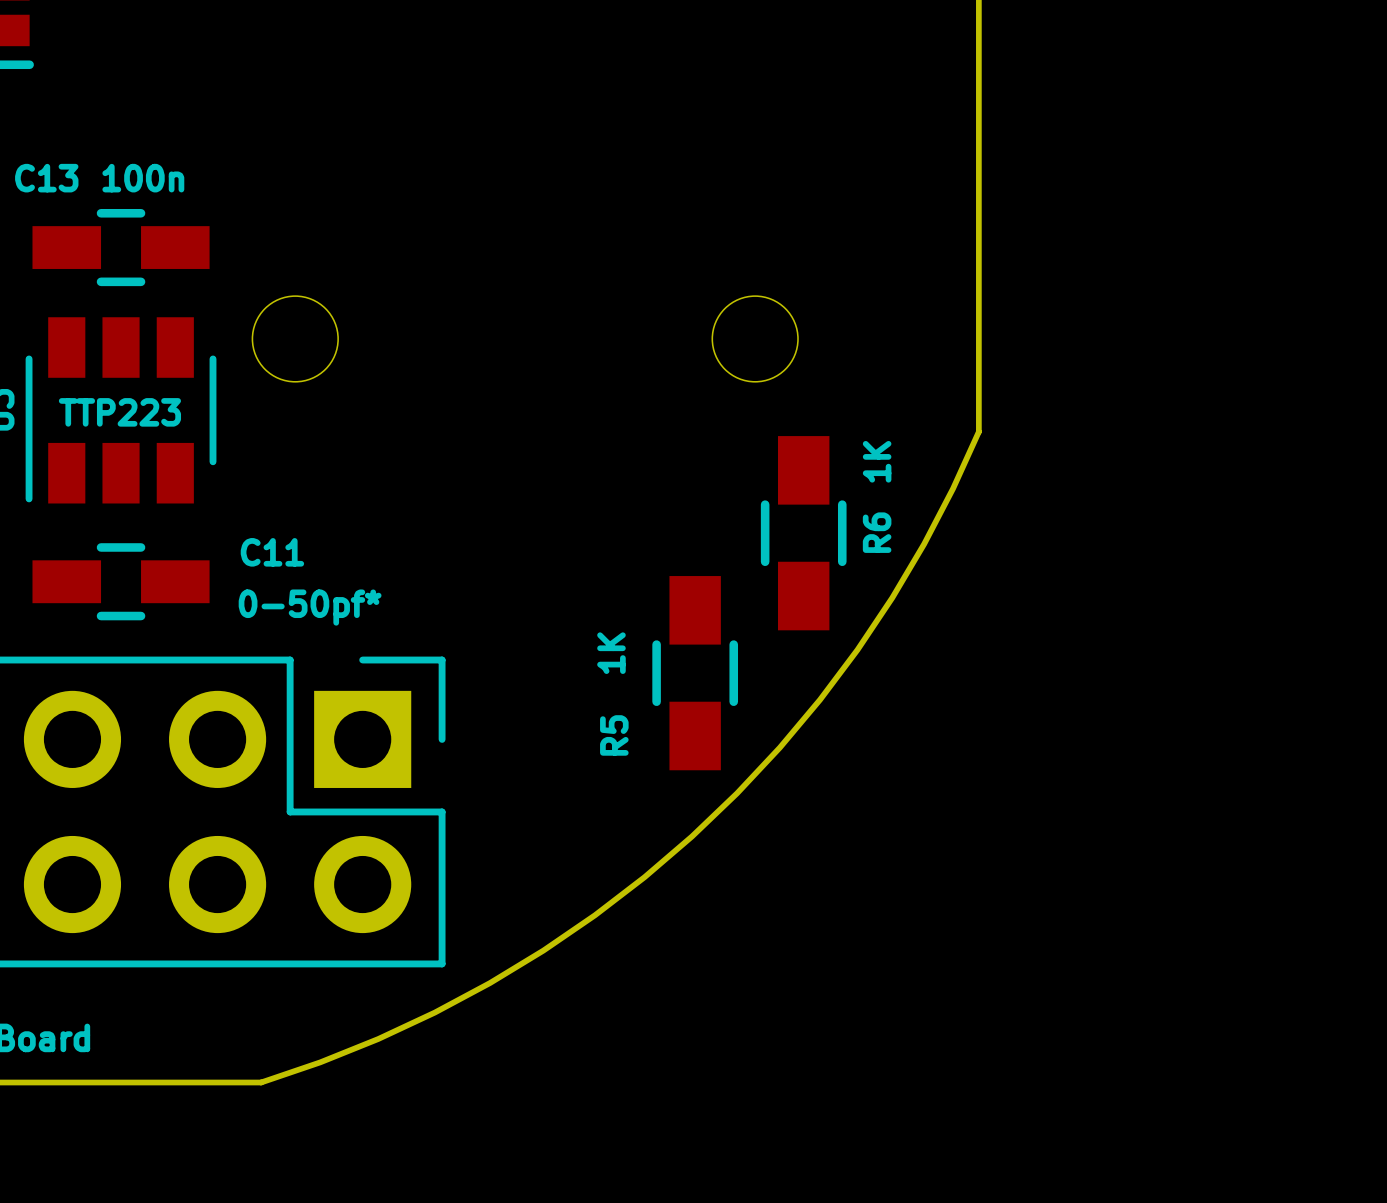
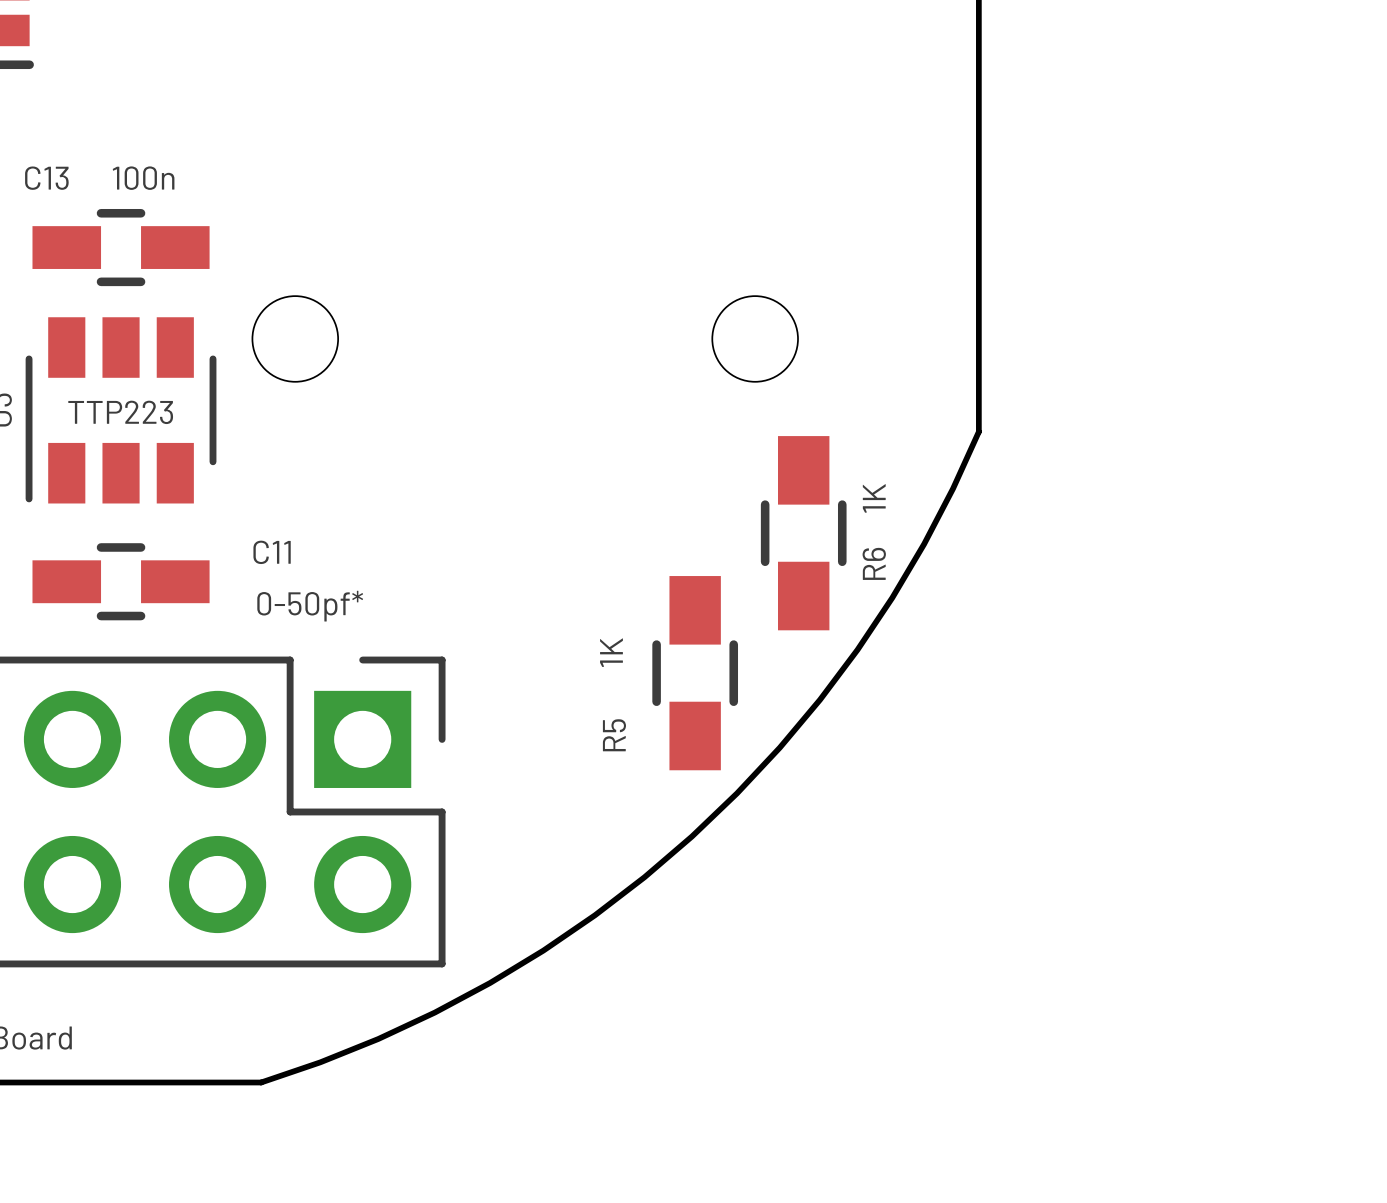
R6 value position: 1K (877, 461) -> 1K (874, 498)
R6 name position: R6 (877, 532) -> R6 (874, 563)

